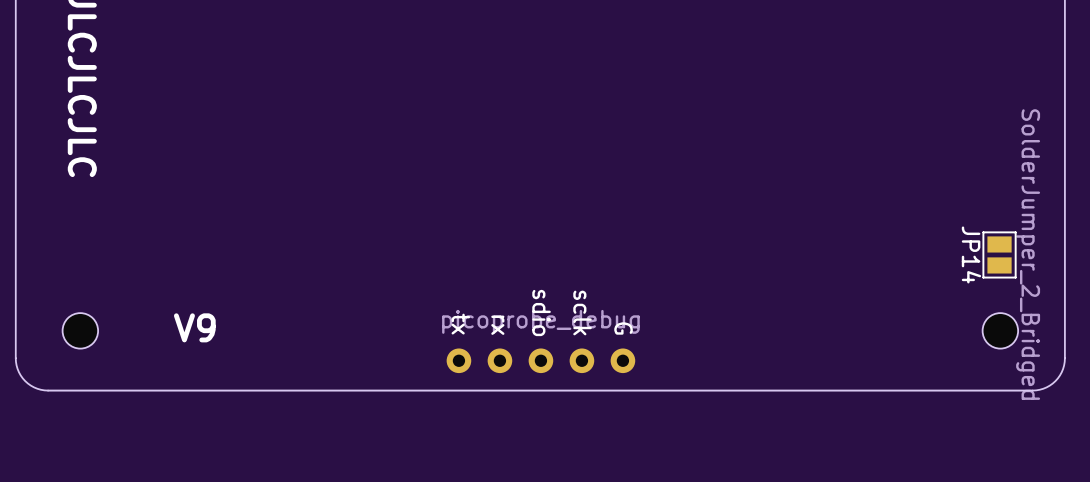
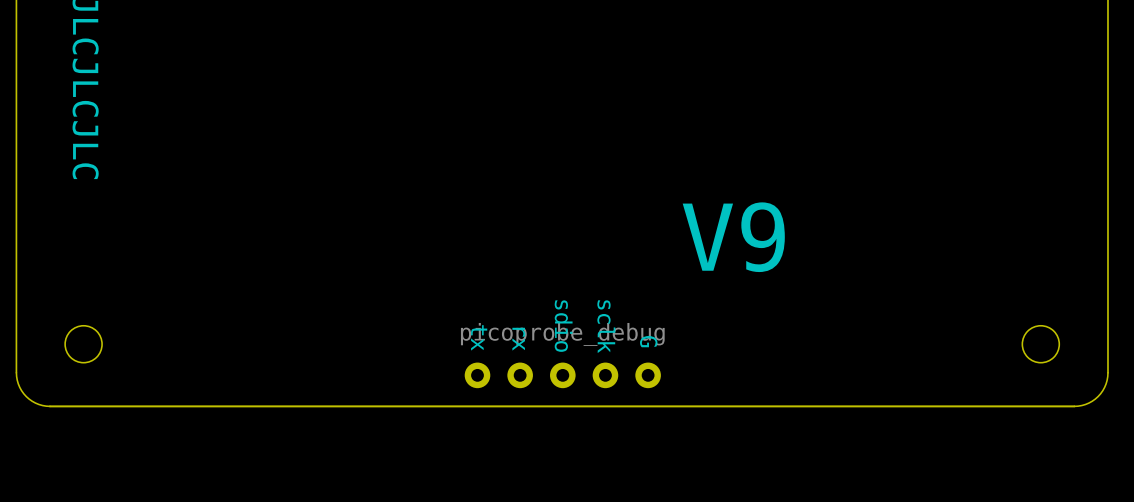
text: none -> V9 (733, 237)
JP14: SolderJumper_2_Bridged (999, 254) -> none
text: V9 (194, 327) -> none

